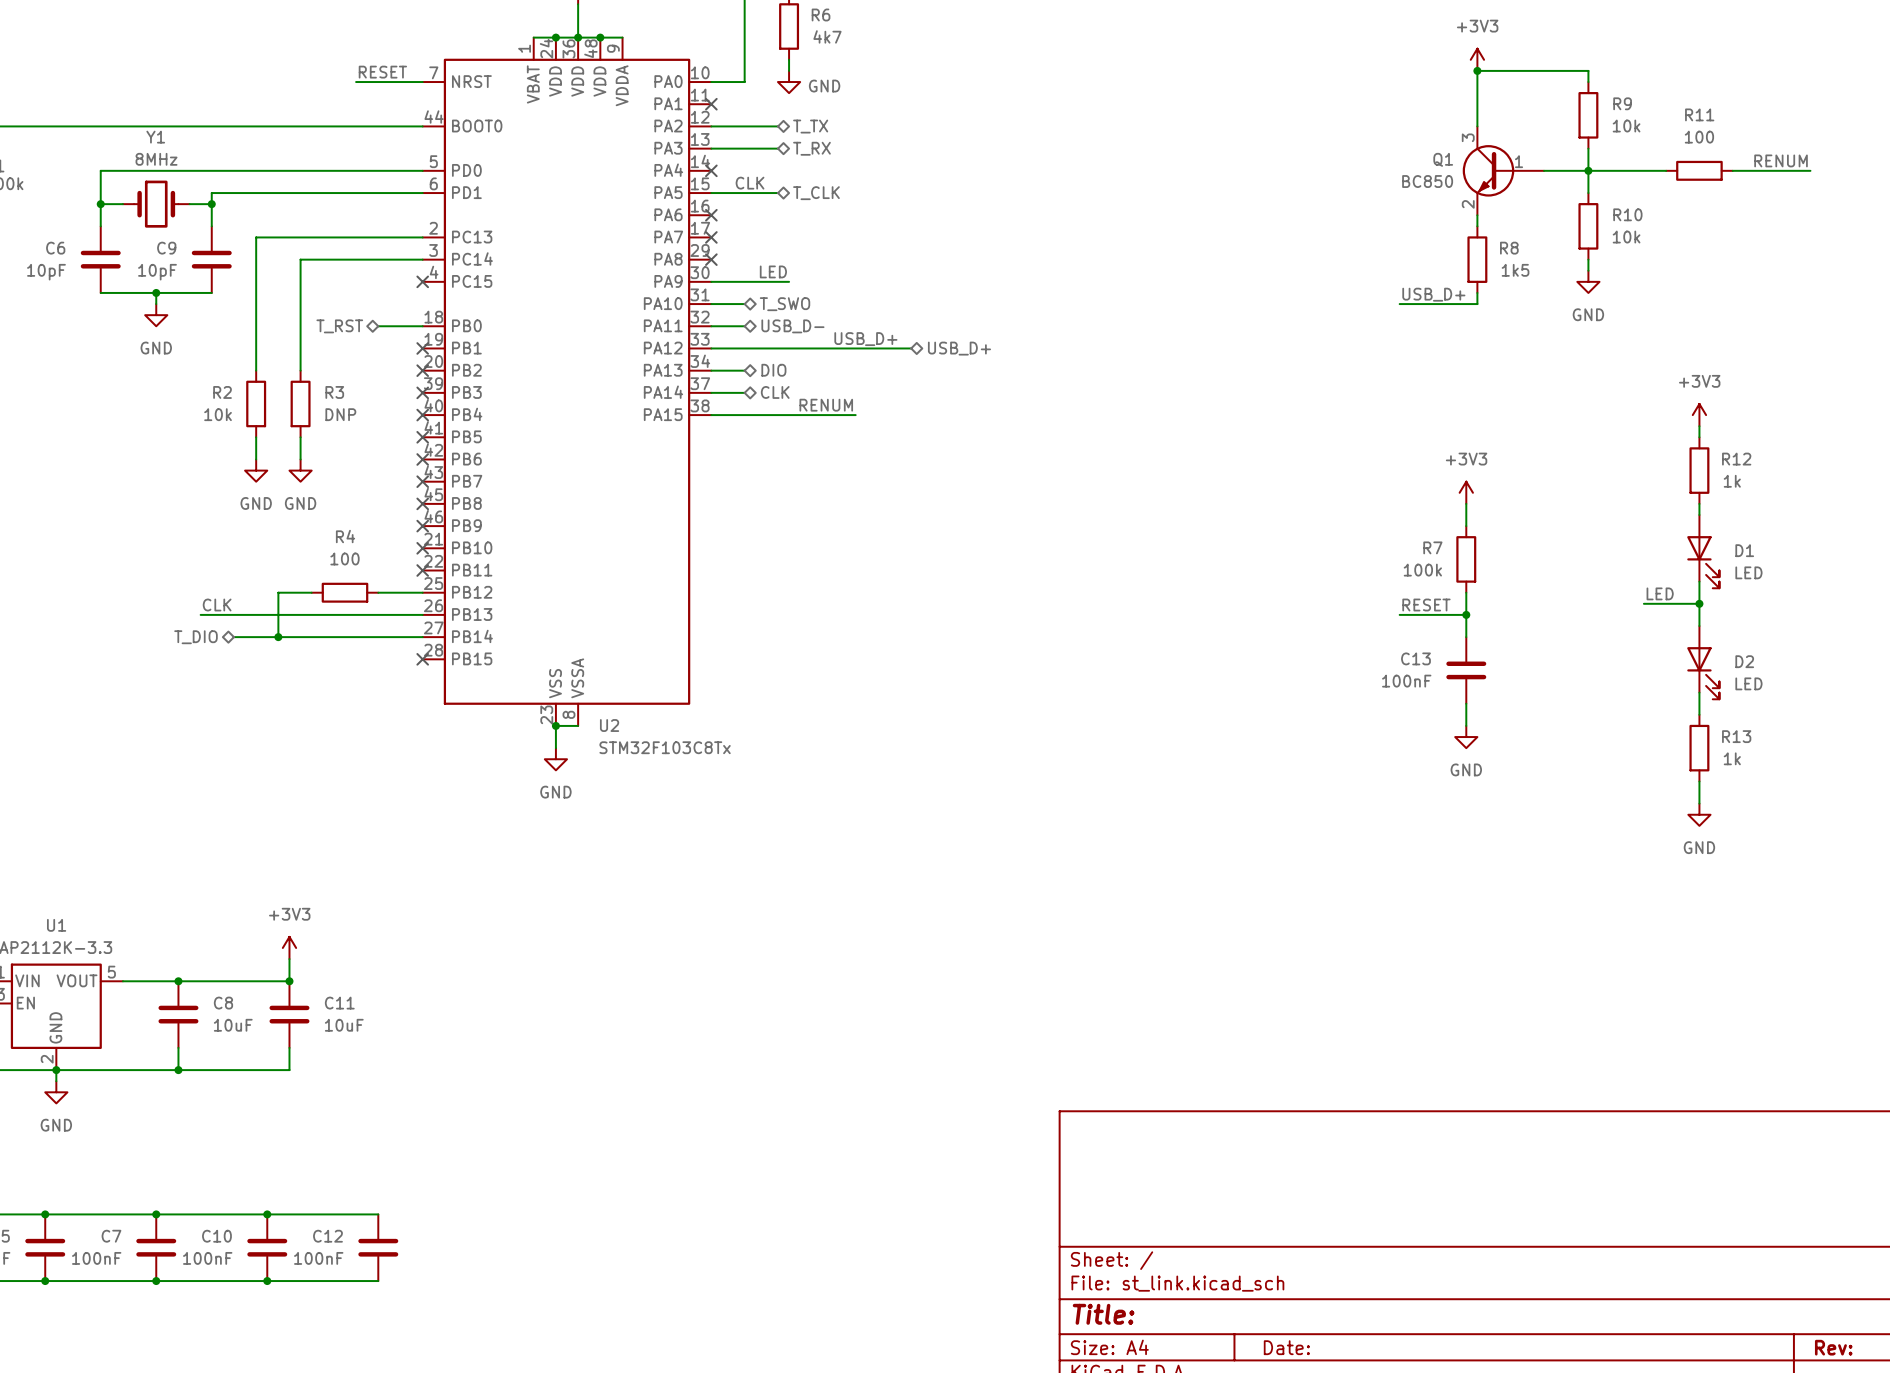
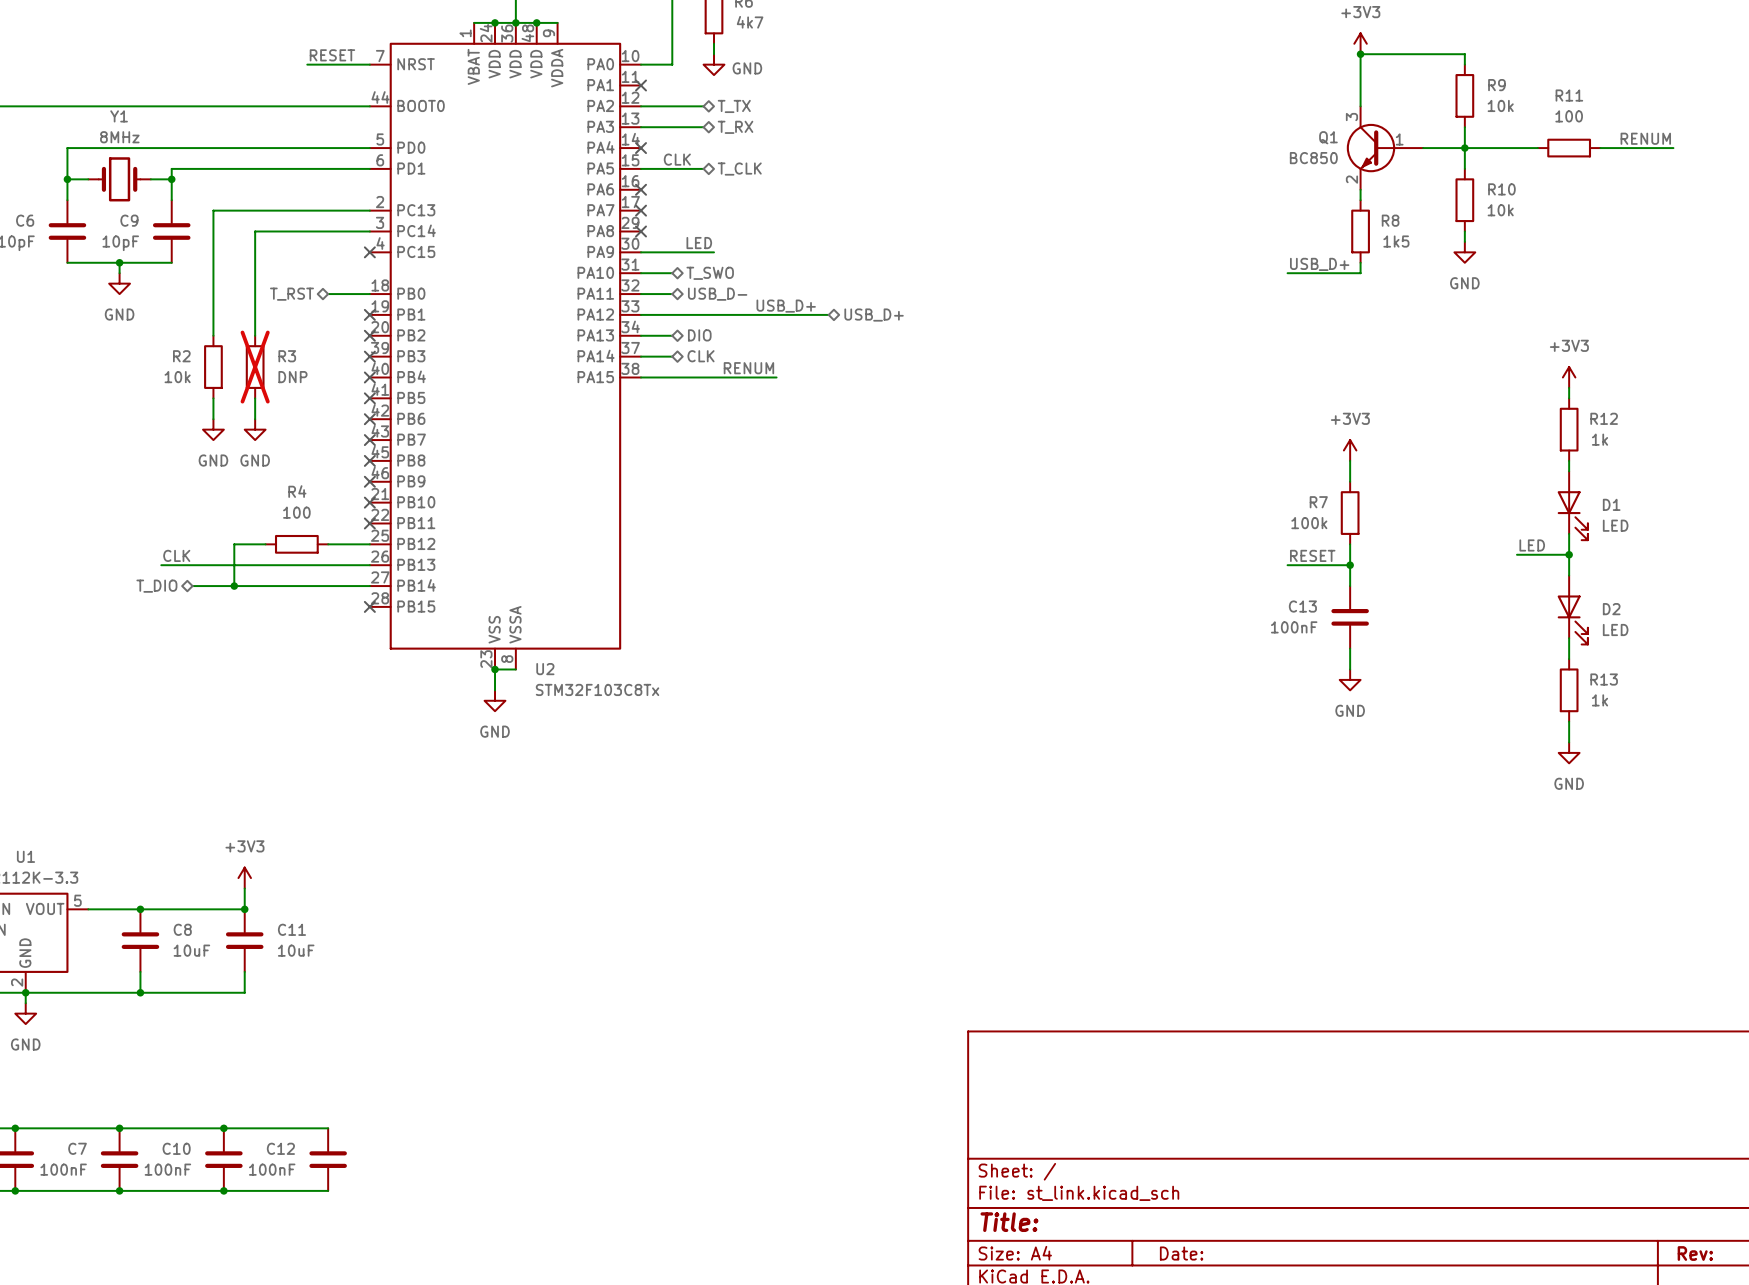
R3 do-not-place cross: none -> (255, 367)

